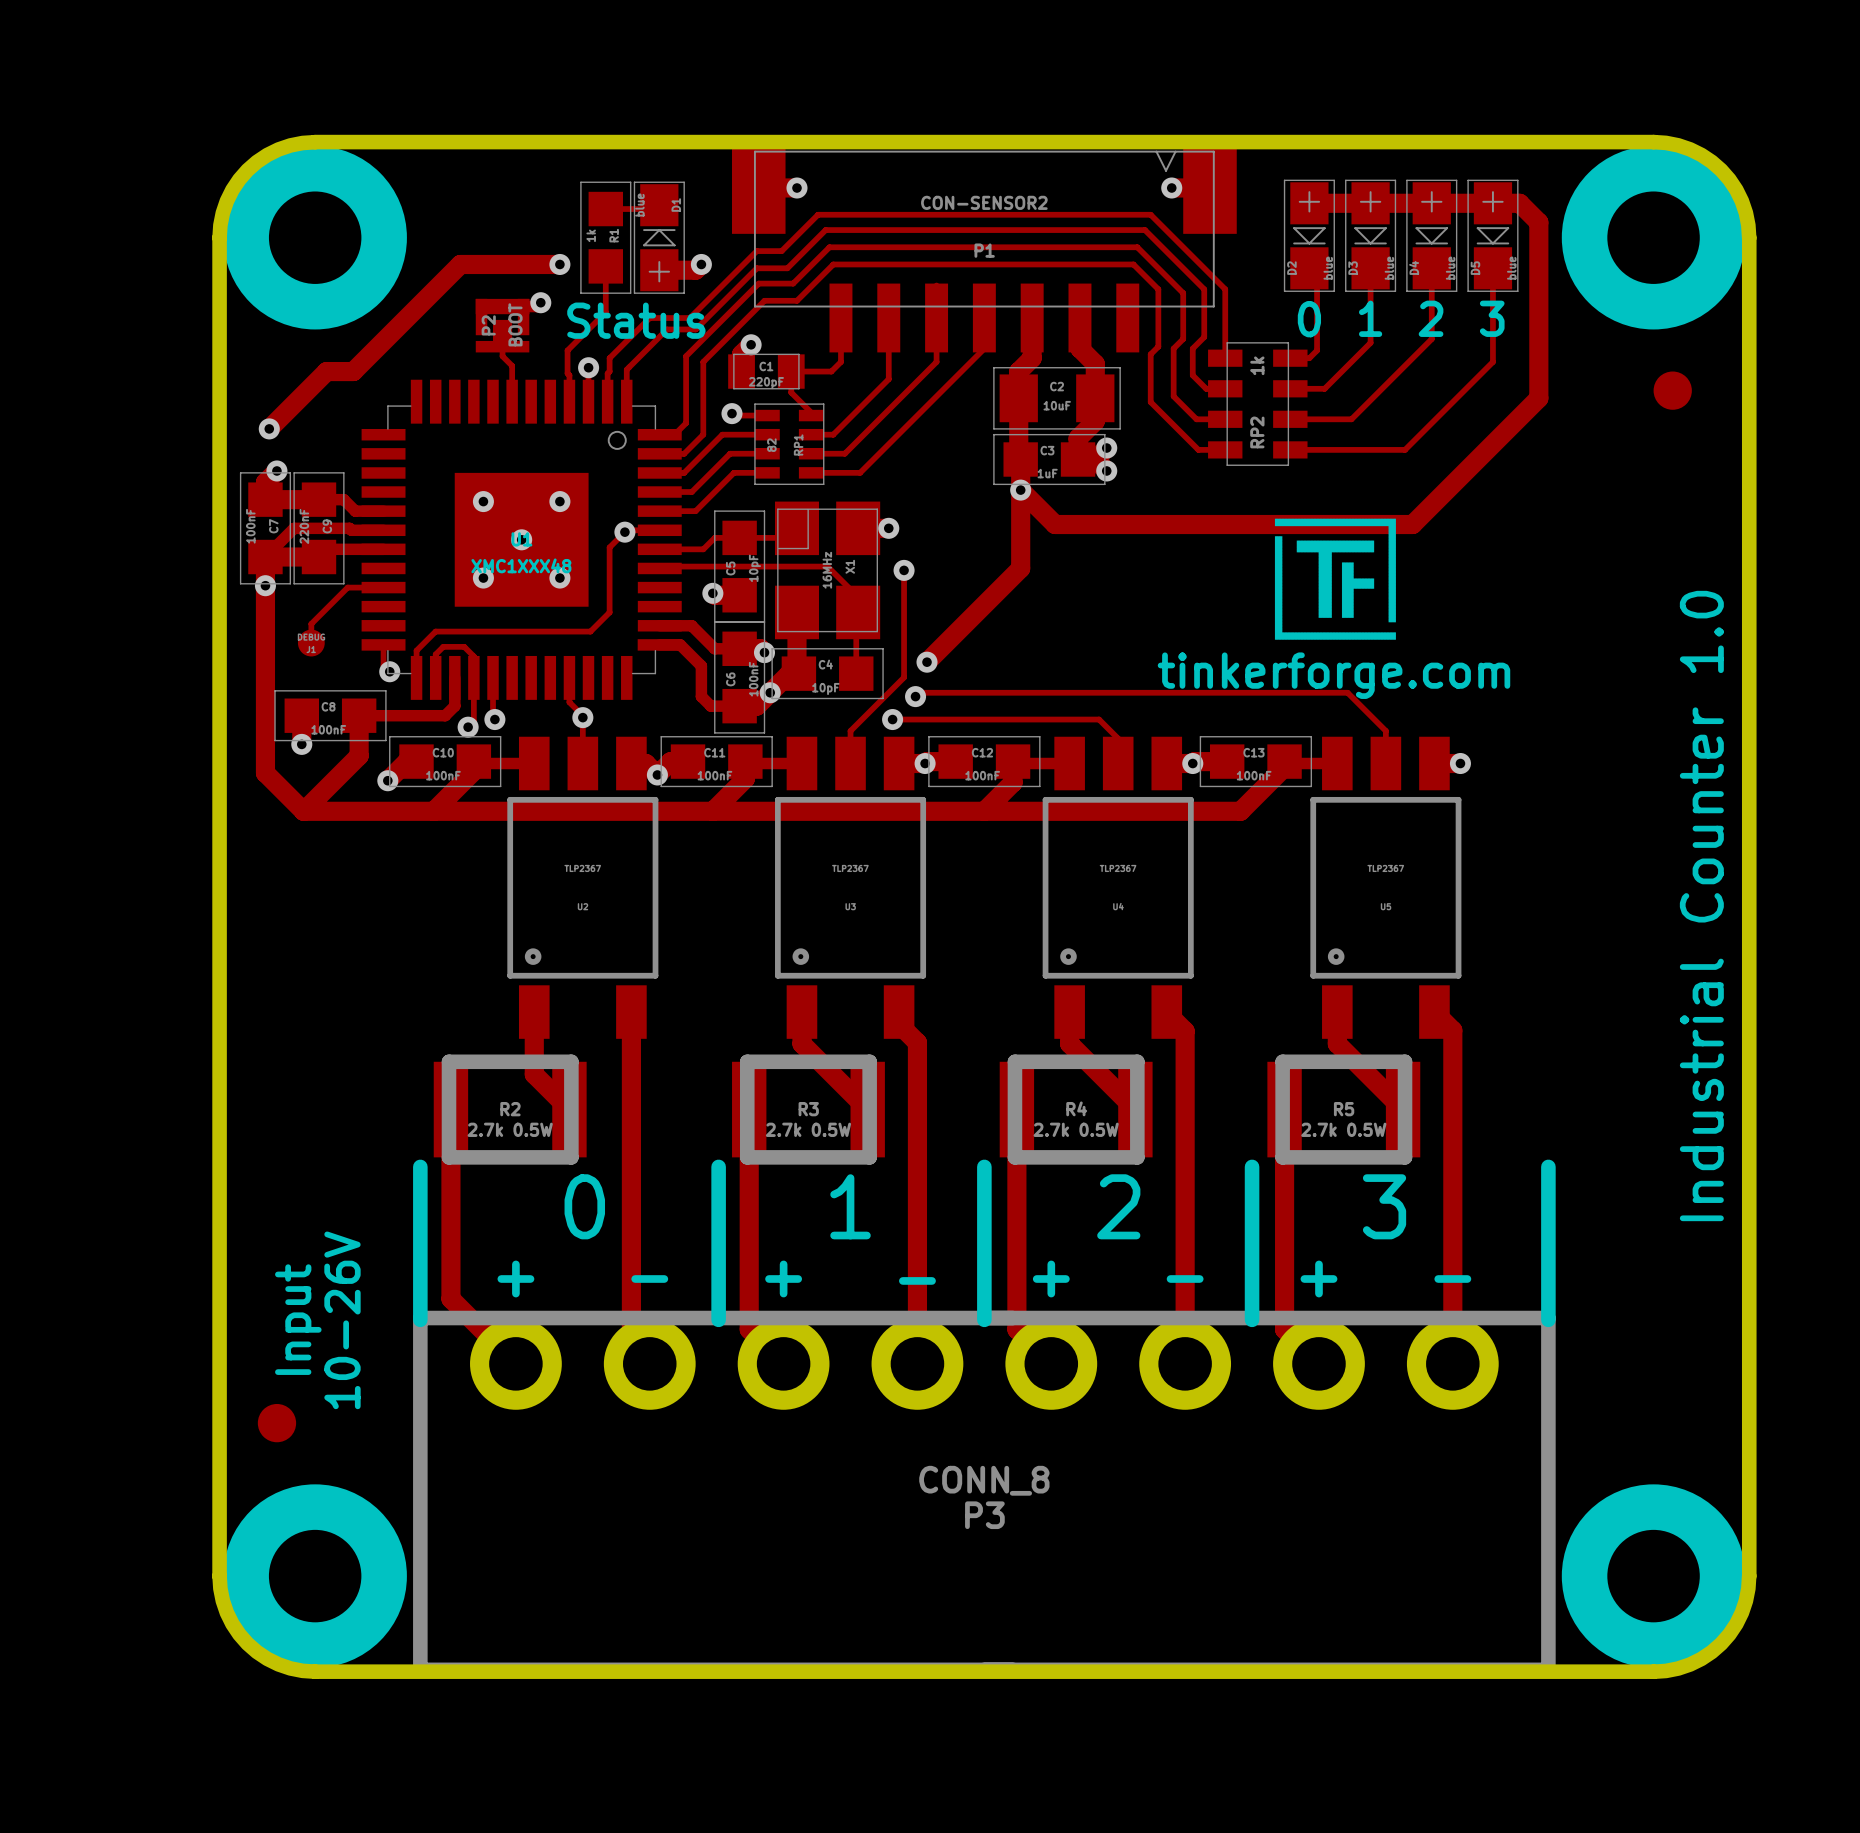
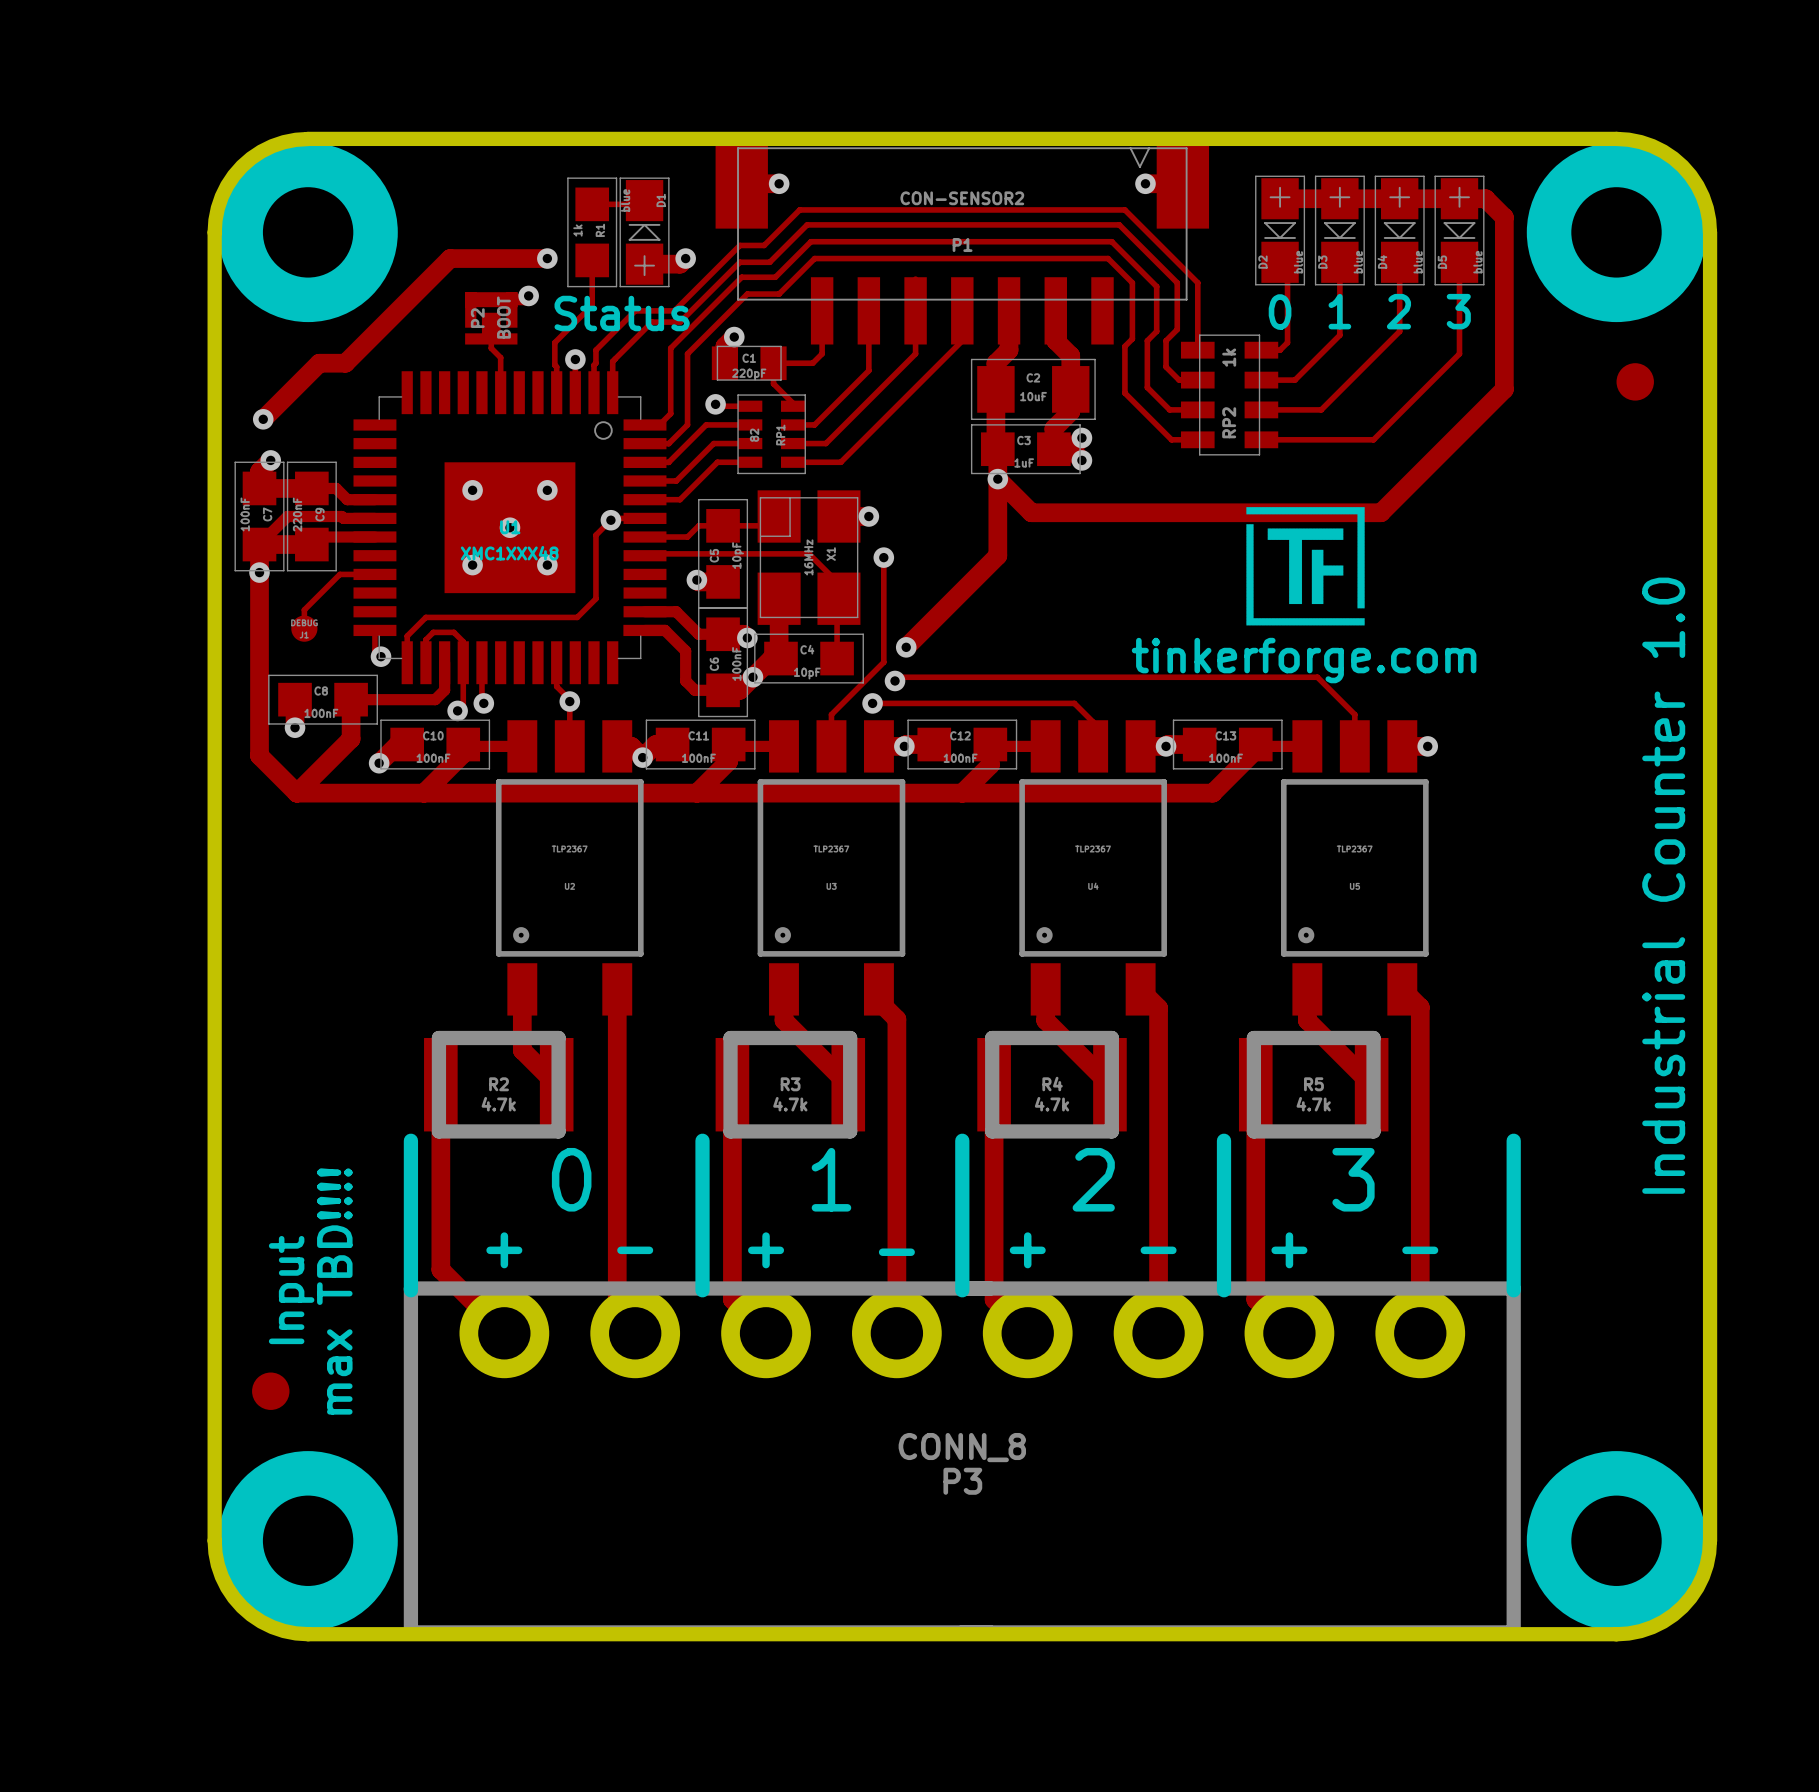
R2 value: 2.7k 0.5W (510, 1129) -> 4.7k (498, 1104)
R3 value: 2.7k 0.5W (808, 1129) -> 4.7k (790, 1104)
R4 value: 2.7k 0.5W (1076, 1129) -> 4.7k (1052, 1104)
R5 value: 2.7k 0.5W (1343, 1129) -> 4.7k (1313, 1104)
text: 10-26V (342, 1320) -> max TBD!!!! (334, 1291)

